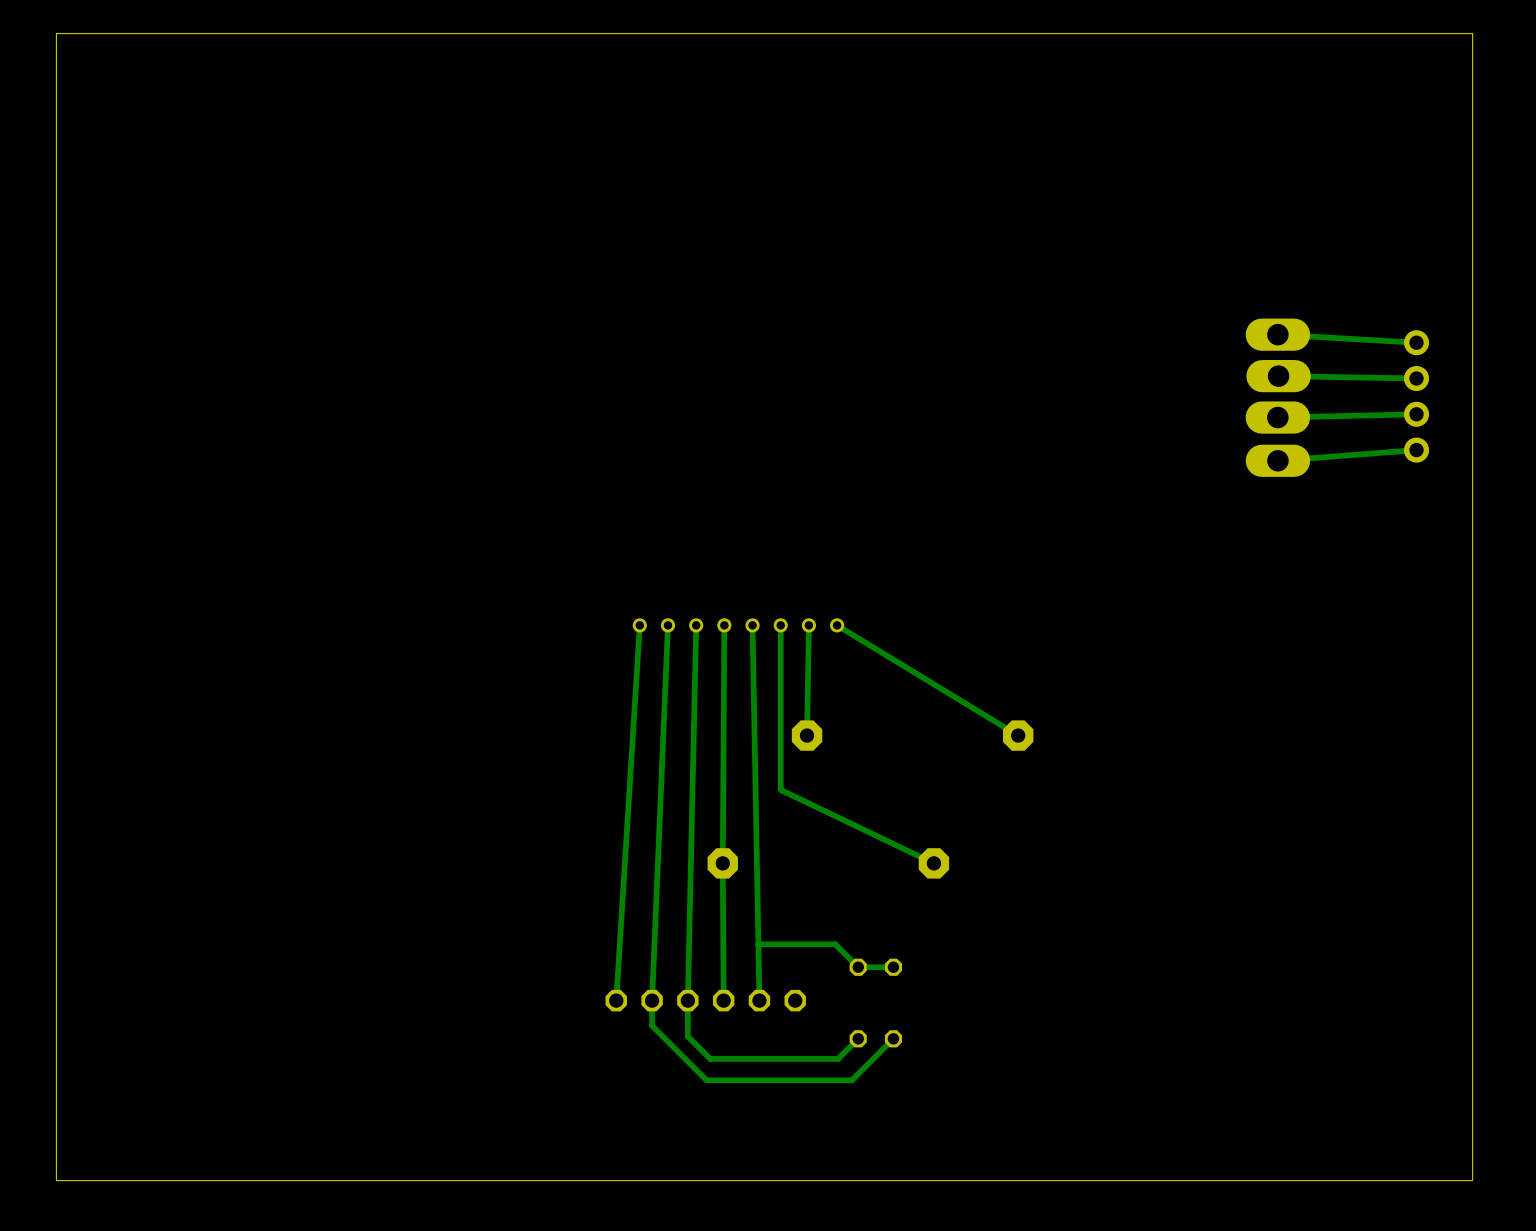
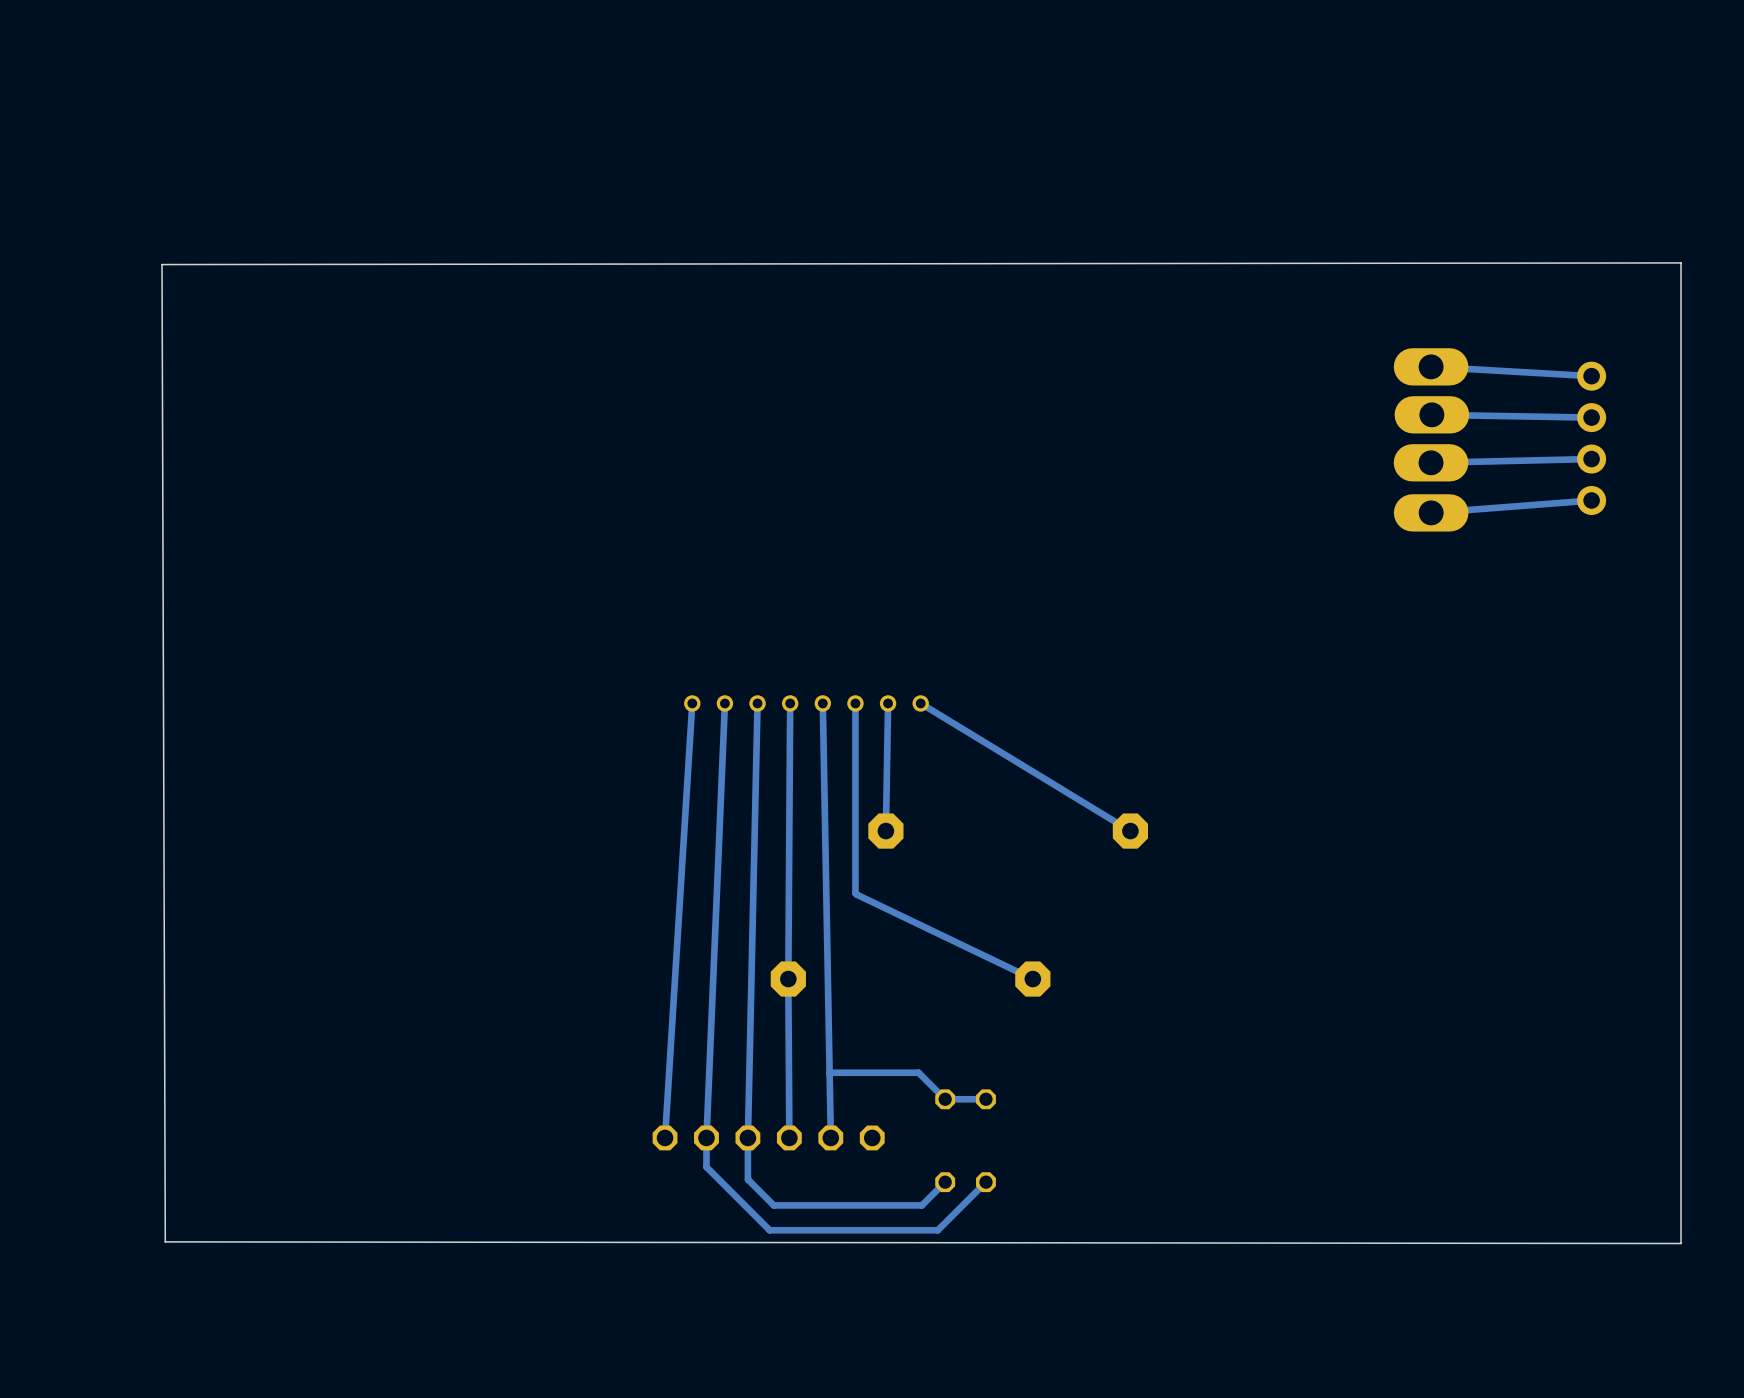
board edge: (1472, 33) (56, 33) (56, 1180) (1472, 1180) (1472, 33) -> (1681, 262) (1681, 1243) (165, 1241) (162, 264) (1681, 262)

